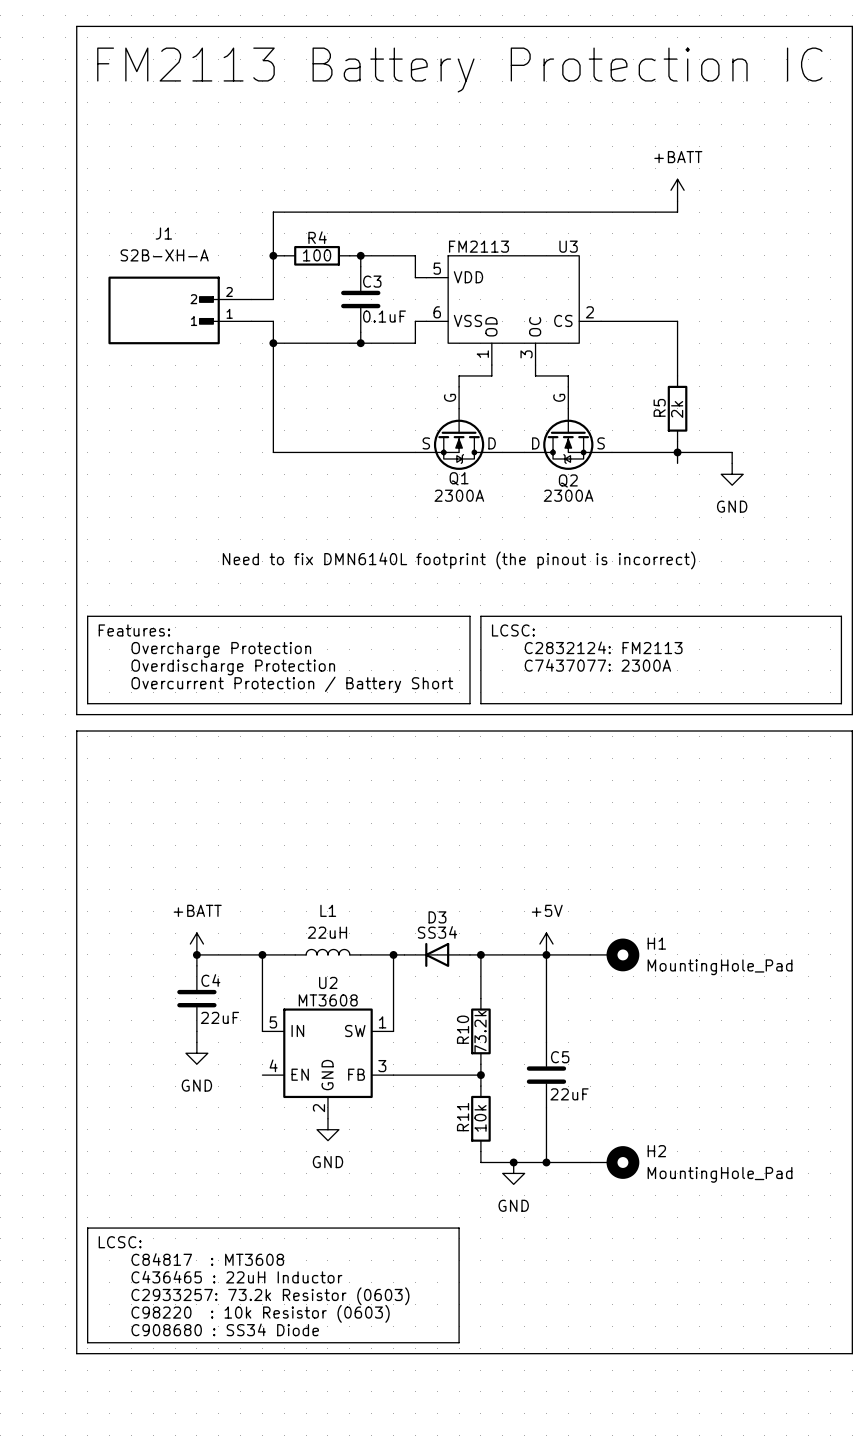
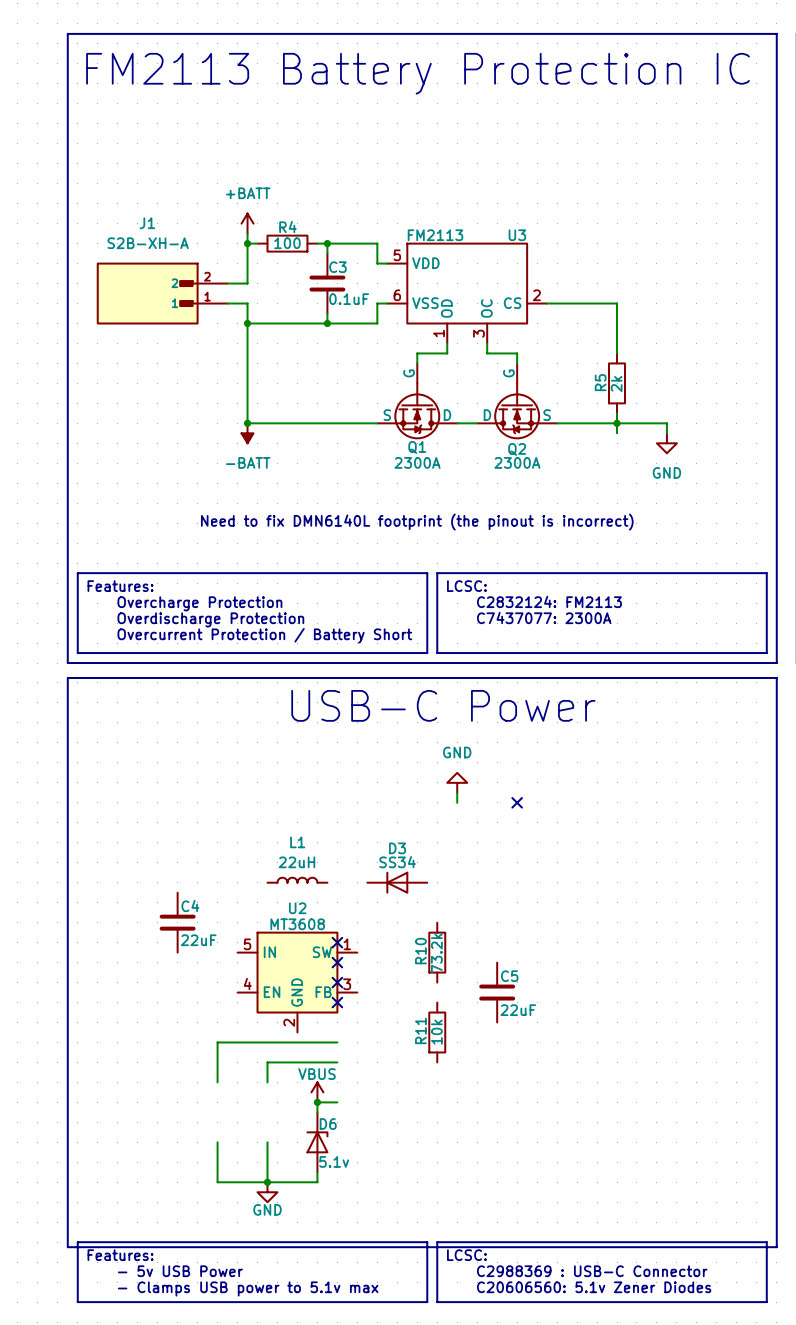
power symbol: +BATT (677, 190) -> none
wire: (677, 201) (677, 212) (273, 212) (273, 244) -> none
power symbol: none -> +BATT (247, 223)
junction: none -> (247, 423)
power symbol: none -> -BATT (247, 433)
text: none -> USB-C Power (443, 705)
power symbol: none -> GND (457, 782)
wire: none -> (457, 792) (457, 802)
no-connect mark: none -> (517, 802)
power symbol: +BATT (196, 944) -> none
power symbol: +5V (546, 944) -> none
junction: (196, 954) -> none
wire: (262, 954) (262, 1031) -> none
junction: (262, 954) -> none
wire: (295, 954) (196, 954) (196, 965) -> none
wire: (360, 954) (404, 954) -> none
wire: (393, 954) (393, 1031) -> none
junction: (393, 954) -> none
wire: (469, 954) (590, 954) -> none
wire: (480, 954) (480, 998) -> none
junction: (480, 954) -> none
wire: (546, 954) (546, 1042) -> none
junction: (546, 954) -> none
H1: MountingHole_Pad (614, 954) -> none
no-connect mark: none -> (337, 942)
wire: (196, 1031) (196, 1042) -> none
no-connect mark: none -> (337, 962)
power symbol: GND (196, 1053) -> none
no-connect mark: none -> (337, 982)
wire: (480, 1064) (480, 1086) -> none
wire: (393, 1075) (480, 1075) -> none
junction: (480, 1075) -> none
no-connect mark: none -> (337, 1002)
wire: (546, 1107) (546, 1162) -> none
power symbol: GND (327, 1129) -> none
wire: none -> (337, 1042) (217, 1042) (217, 1082)
wire: none -> (337, 1062) (267, 1062) (267, 1082)
wire: (480, 1151) (480, 1162) (590, 1162) -> none
junction: (513, 1162) -> none
junction: (546, 1162) -> none
H2: MountingHole_Pad (614, 1162) -> none
power symbol: GND (513, 1173) -> none
power symbol: none -> VBUS (317, 1092)
junction: none -> (317, 1102)
wire: none -> (337, 1102) (317, 1102) (317, 1112)
line: (87, 1228) (459, 1228) (459, 1342) (87, 1342) (87, 1228) -> none
wire: none -> (217, 1142) (217, 1182) (317, 1182) (317, 1172)
wire: none -> (267, 1142) (267, 1182)
D6: none -> 5.1v (317, 1142)
text: LCSC: (120, 1242) -> none
text: C84817 : MT3608 (207, 1259) -> none
text: C436465 : 22uH Inductor (236, 1277) -> none
junction: none -> (267, 1182)
power symbol: none -> GND (267, 1192)
text: C2933257: 73.2k Resistor (0603) (270, 1296) -> none
text: C98220 : 10k Resistor (0603) (260, 1313) -> none
text: C908680 : SS34 Diode (225, 1329) -> none
line: none -> (77, 1242) (77, 1302) (427, 1302) (427, 1242) (77, 1242)
line: none -> (437, 1242) (766, 1242) (766, 1302) (437, 1302) (437, 1242)
text: none -> Features: (120, 1255)
text: none -> LCSC: (466, 1255)
text: none -> - 5v USB Power (180, 1271)
text: none -> C2988369 : USB-C Connector (592, 1271)
text: none -> C20606560: 5.1v Zener Diodes (594, 1287)
text: none -> - Clamps USB power to 5.1v max (248, 1288)

